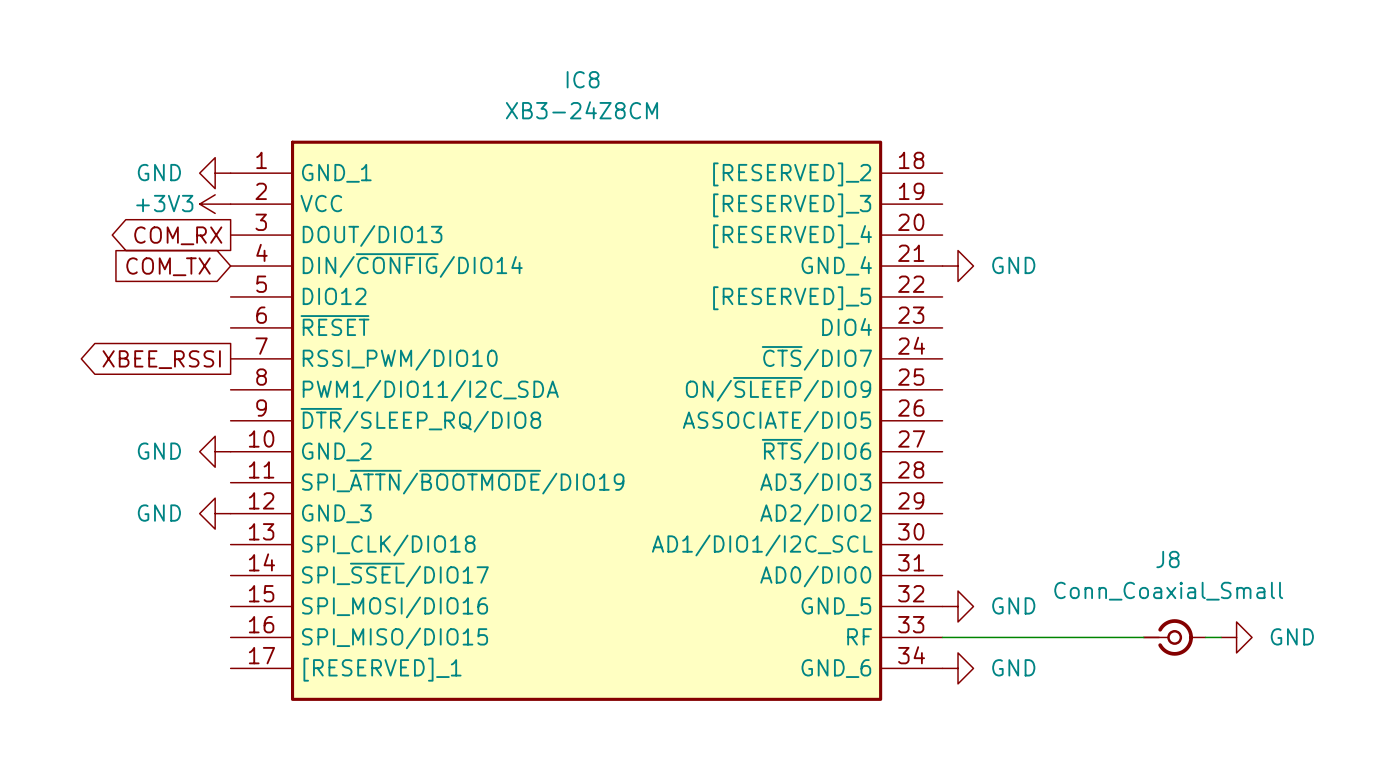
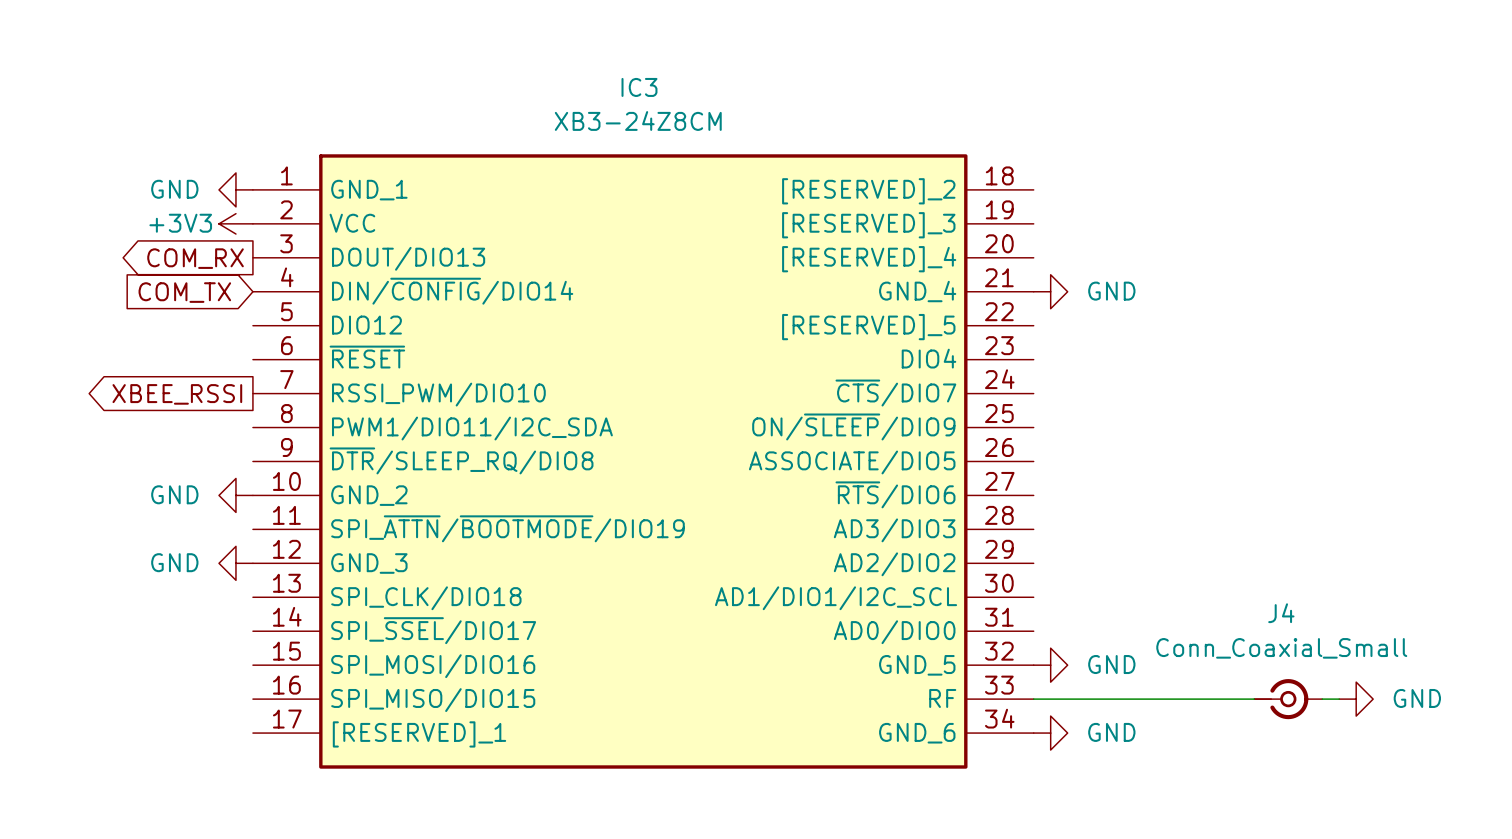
IC8 name: IC8 (583, 79) -> IC3 (639, 87)
J8 name: J8 (1167, 559) -> J4 (1281, 613)

